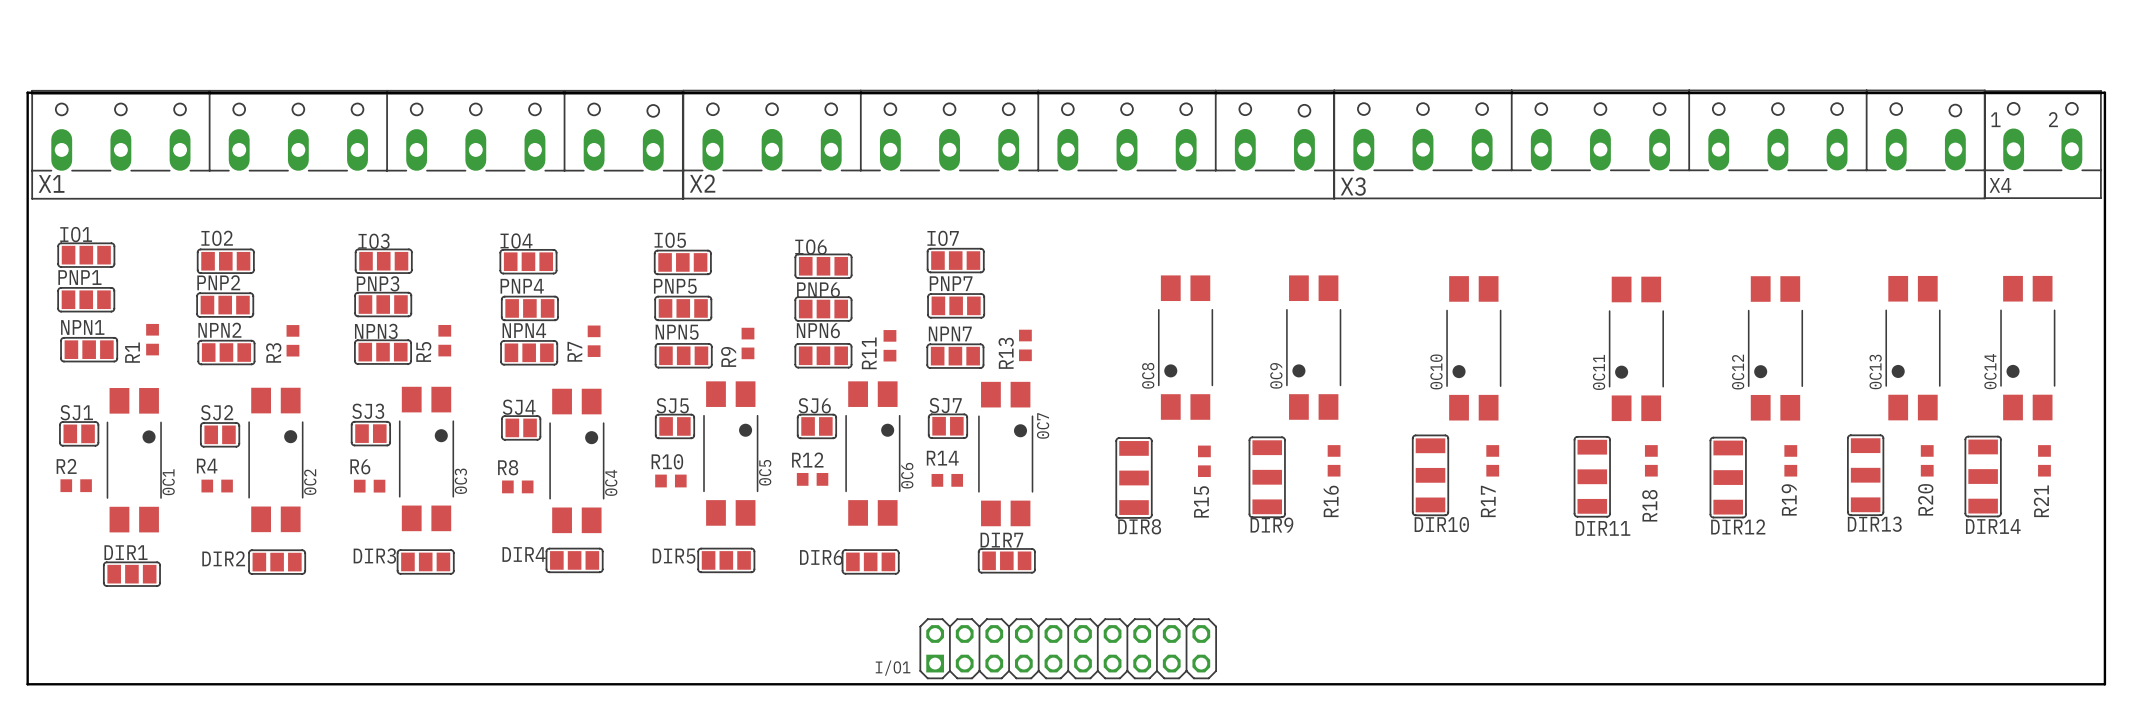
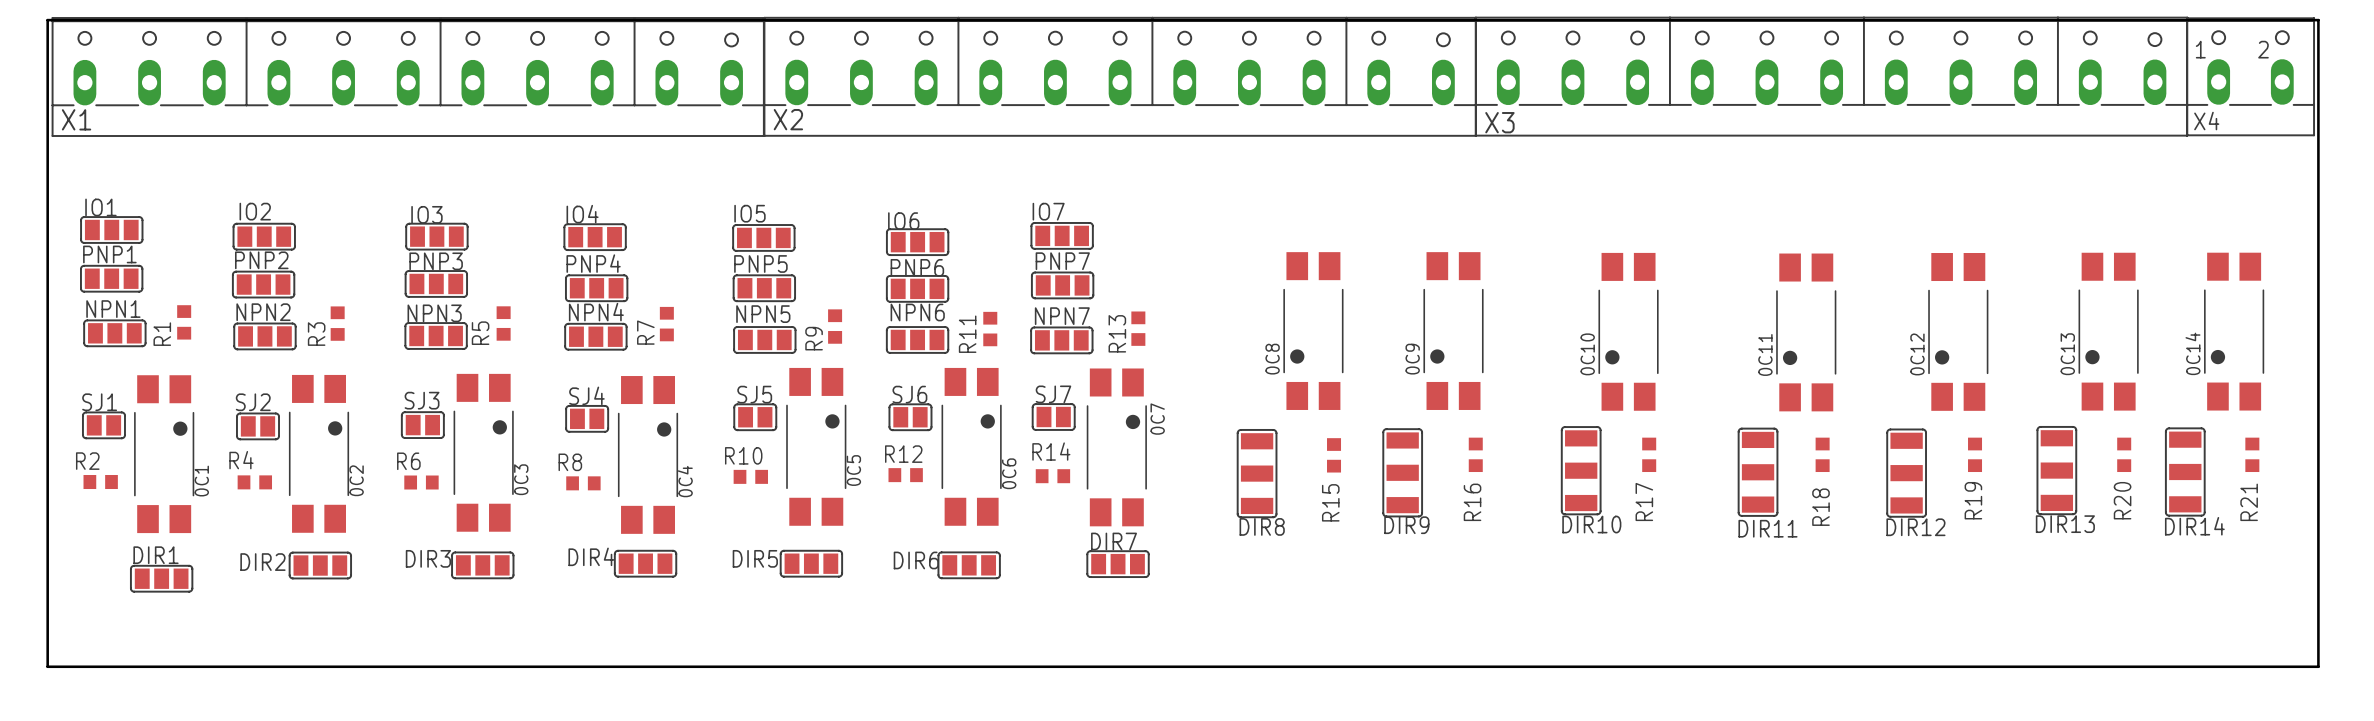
board edge: (27, 92) (2104, 92) -> (47, 52) (47, 20) (2318, 20) (2318, 52)
X1 position: (357, 144) -> (408, 76)
X2 position: (1008, 144) -> (1120, 76)
X3 position: (1659, 144) -> (1831, 76)
X4 position: (2042, 144) -> (2250, 76)
I/O1: (1068, 648) -> none
board edge: (27, 654) (27, 684) (2104, 684) (2104, 654) -> (47, 666) (2318, 666)

